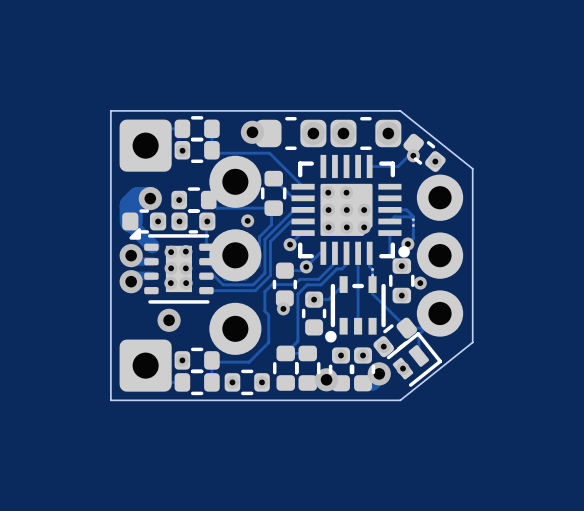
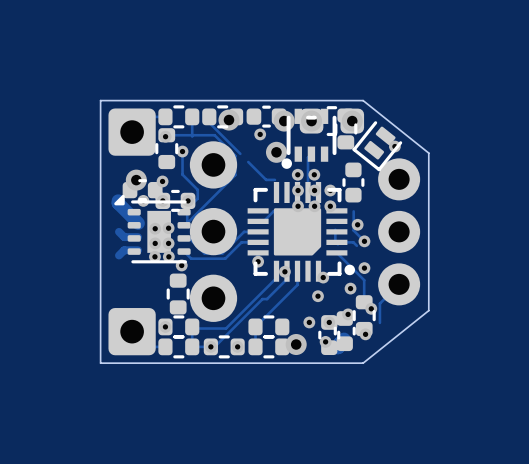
part footprint: [255, 116, 327, 150] -> [246, 105, 287, 128]
part: none -> (222, 116)
part footprint: [403, 133, 446, 172] -> [352, 121, 403, 172]
track: none -> (209, 122) (240, 153)
part: none -> (345, 128)
via: none -> (260, 134)
track: none -> (166, 135) (214, 135) (235, 155) (235, 175) (184, 225)
part: (197, 150) -> none
track: (211, 150) (214, 153) (269, 153) (303, 186) -> none
track: (413, 155) (408, 155) (398, 166) (369, 166) -> none
via: (413, 155) -> none
part: none -> (166, 148)
track: none -> (182, 151) (182, 174) (189, 181)
via: none -> (182, 151)
via: none -> (276, 152)
track: none -> (311, 154) (308, 157) (308, 192)
track: (153, 189) (150, 192) (150, 198) (138, 198) (131, 205) (131, 221) -> none
part: (273, 193) -> none
part: (193, 200) -> none
part: none -> (353, 182)
track: (269, 205) (271, 207) (271, 224) (259, 237) (259, 265) -> (258, 231) (244, 231) (235, 240)
track: (216, 208) (273, 208) -> (196, 188) (197, 198) (184, 212)
track: (303, 209) (294, 209) (264, 239) (264, 273) (253, 284) (223, 284) (214, 276) (206, 276) -> none
part position: (350, 209) -> (301, 231)
track: (389, 209) (406, 209) (413, 216) (413, 219) (410, 216) (394, 216) (389, 221) -> none
via: (247, 220) -> none
part position: (144, 221) -> (142, 190)
track: (303, 221) (290, 221) (270, 241) (270, 275) (255, 290) (206, 290) -> none
part: (413, 222) -> none
track: (413, 225) (413, 238) (407, 244) -> none
via: (290, 244) -> none
via position: (407, 244) -> (357, 224)
track: (323, 253) (319, 253) (302, 270) (284, 270) -> none
track: (334, 253) (334, 263) (318, 279) (299, 279) (294, 284) (272, 284) (264, 291) (264, 311) (268, 315) (268, 342) -> (276, 271) (276, 278) (243, 310)
track: (346, 253) (346, 264) (341, 268) (336, 268) (321, 284) (307, 284) (297, 294) (297, 341) (285, 353) (307, 353) -> none
track: (358, 253) (358, 326) -> none
via: (131, 255) -> none
part position: (171, 265) -> (152, 229)
via: (306, 266) -> none
track: none -> (258, 242) (241, 242) (225, 258) (191, 258) (184, 251)
track: none -> (336, 242) (353, 242) (356, 245)
part: (372, 272) -> none
track: (372, 275) (372, 293) (406, 328) (425, 328) -> none
track: none -> (336, 252) (364, 280) (364, 302)
part: (401, 280) -> none
via: (131, 281) -> none
via: (420, 283) -> none
part: (284, 284) -> none
track: (343, 284) (328, 299) (314, 299) -> none
via: none -> (258, 261)
via: none -> (181, 265)
track: none -> (287, 271) (287, 279) (267, 299) (262, 299) (214, 346) (192, 346)
track: none -> (297, 271) (297, 284) (255, 326) (255, 346)
via: none -> (323, 277)
via: (283, 308) -> none
part position: (355, 309) -> (309, 138)
part: (314, 313) -> none
via: none -> (350, 288)
via: (169, 320) -> none
part: none -> (178, 294)
via: none -> (317, 296)
part: (395, 337) -> none
via: none -> (371, 308)
part: none -> (364, 315)
part: (414, 359) -> none
part: none -> (268, 326)
part: (285, 368) -> none
part: (307, 368) -> none
part position: (341, 369) -> (344, 331)
via: (379, 373) -> none
via: none -> (325, 341)
part: none -> (268, 346)

